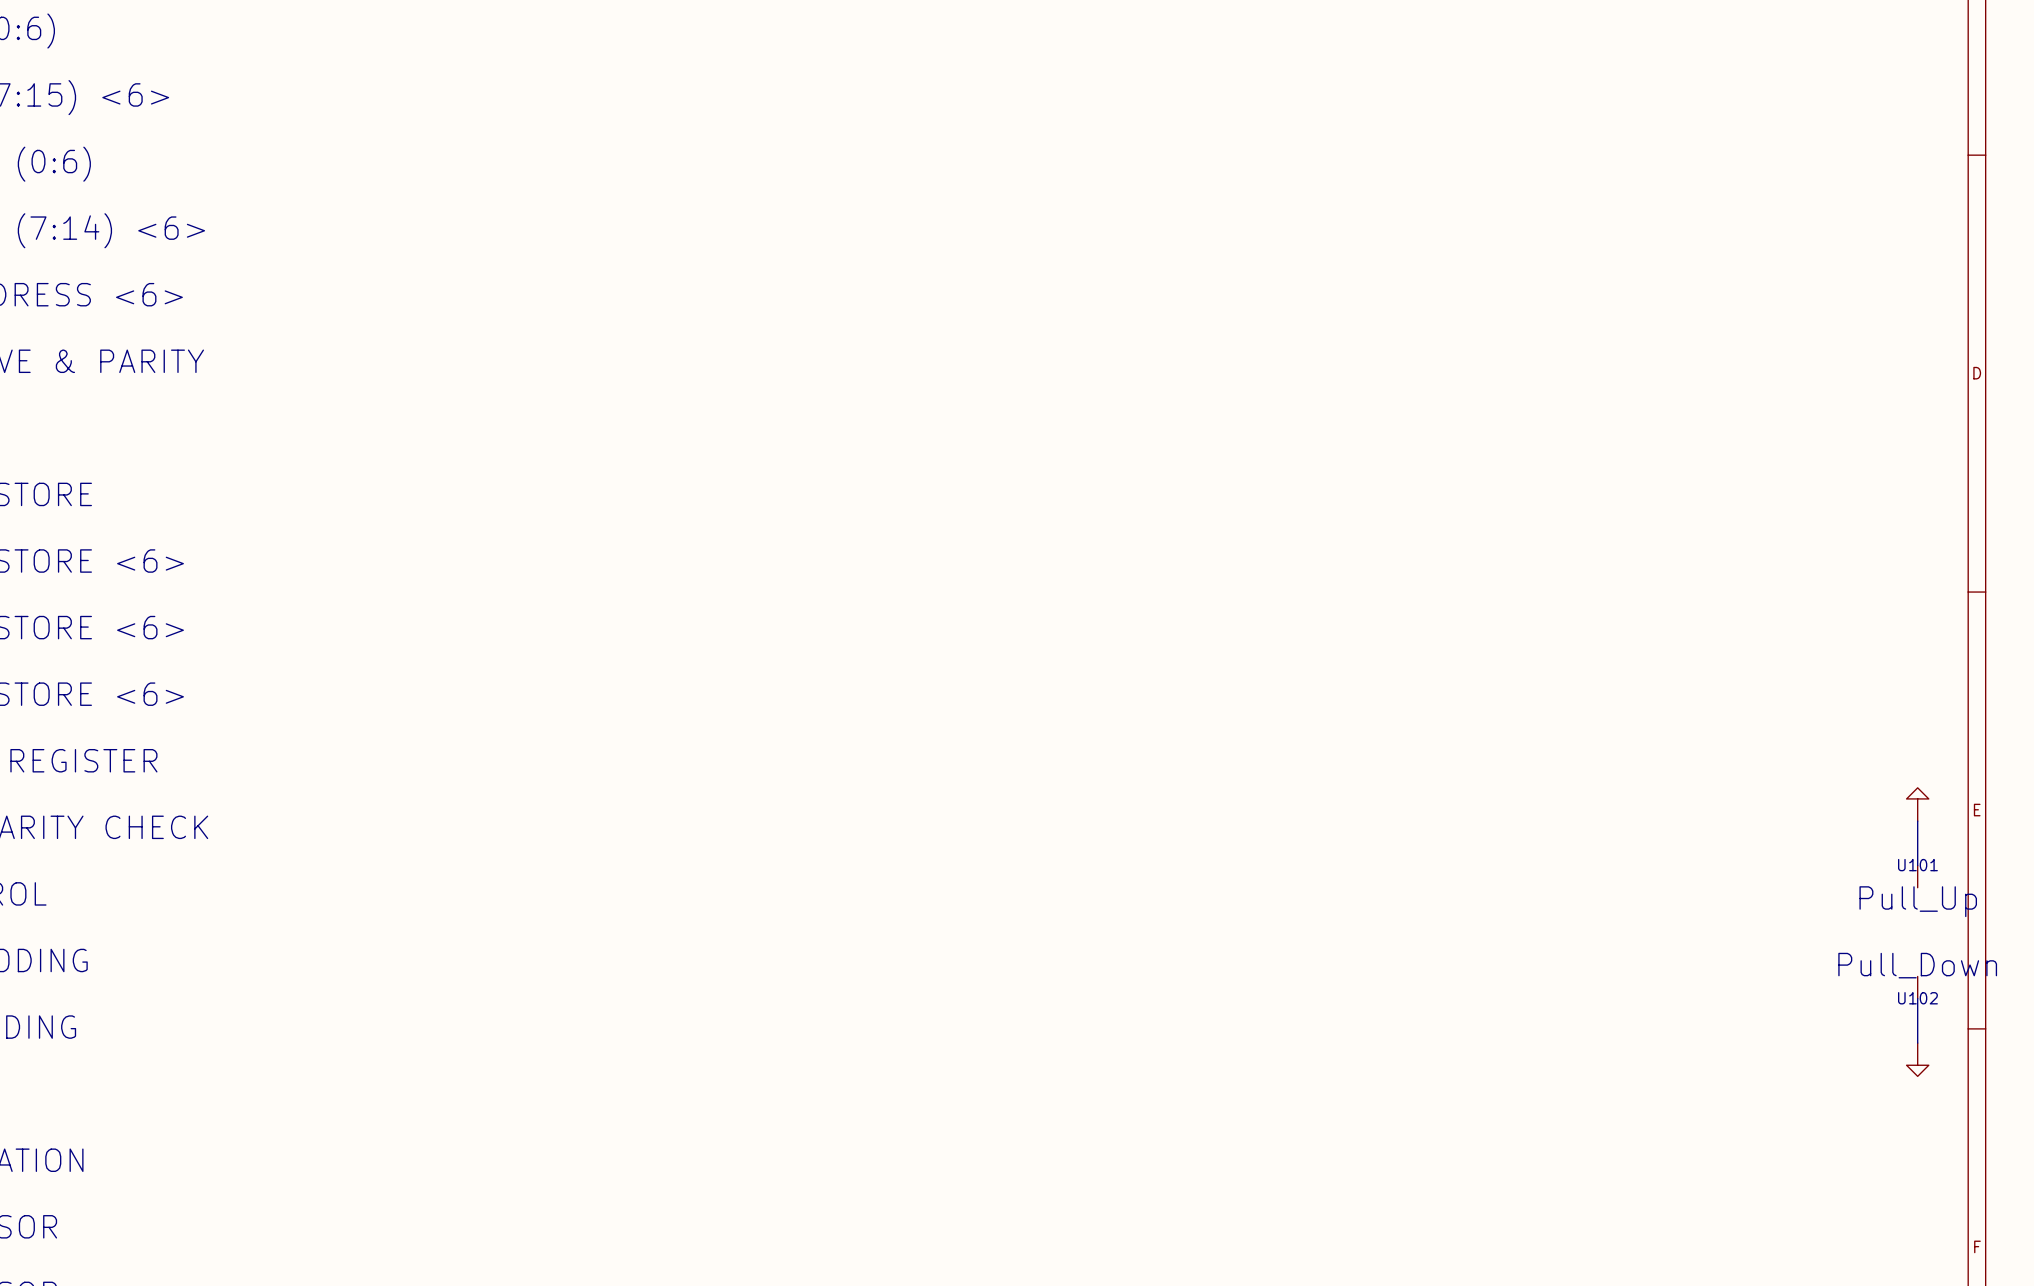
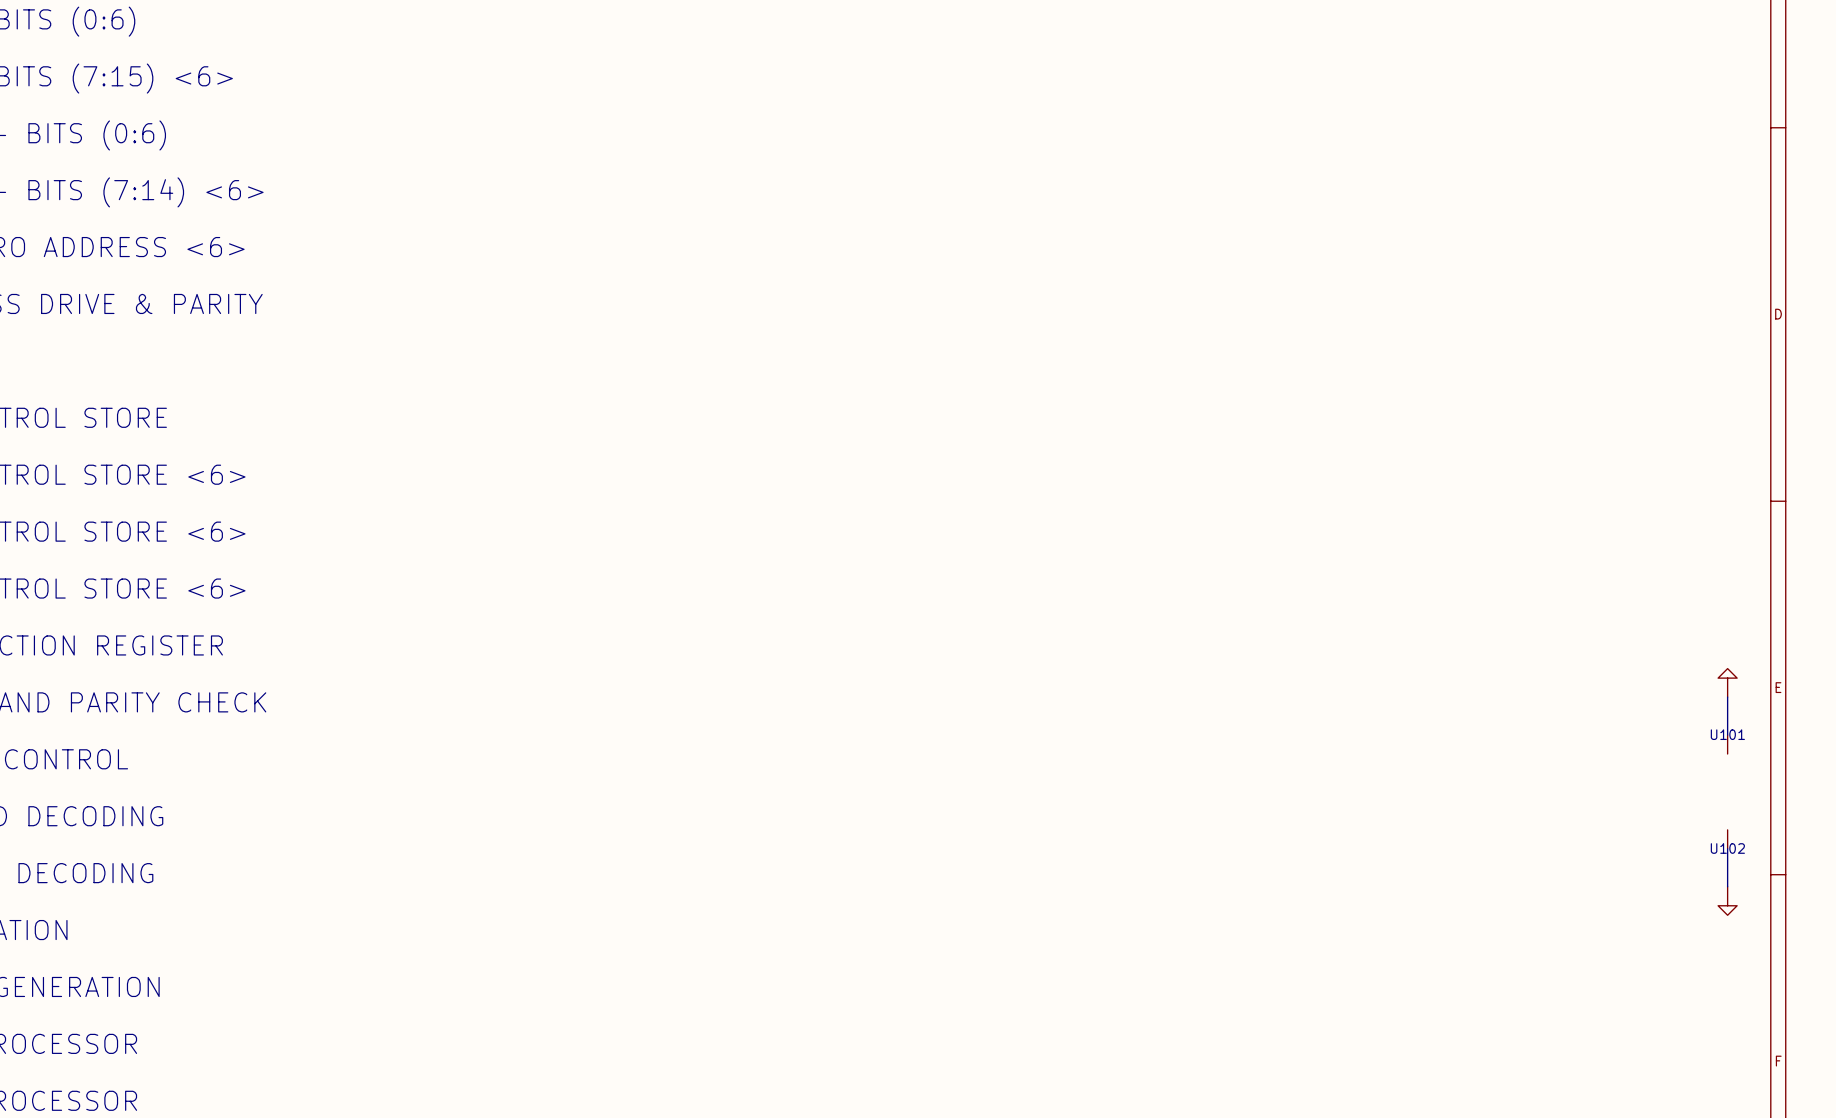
U101 value: Pull_Up (1918, 901) -> none
U102 value: Pull_Down (1917, 965) -> none

